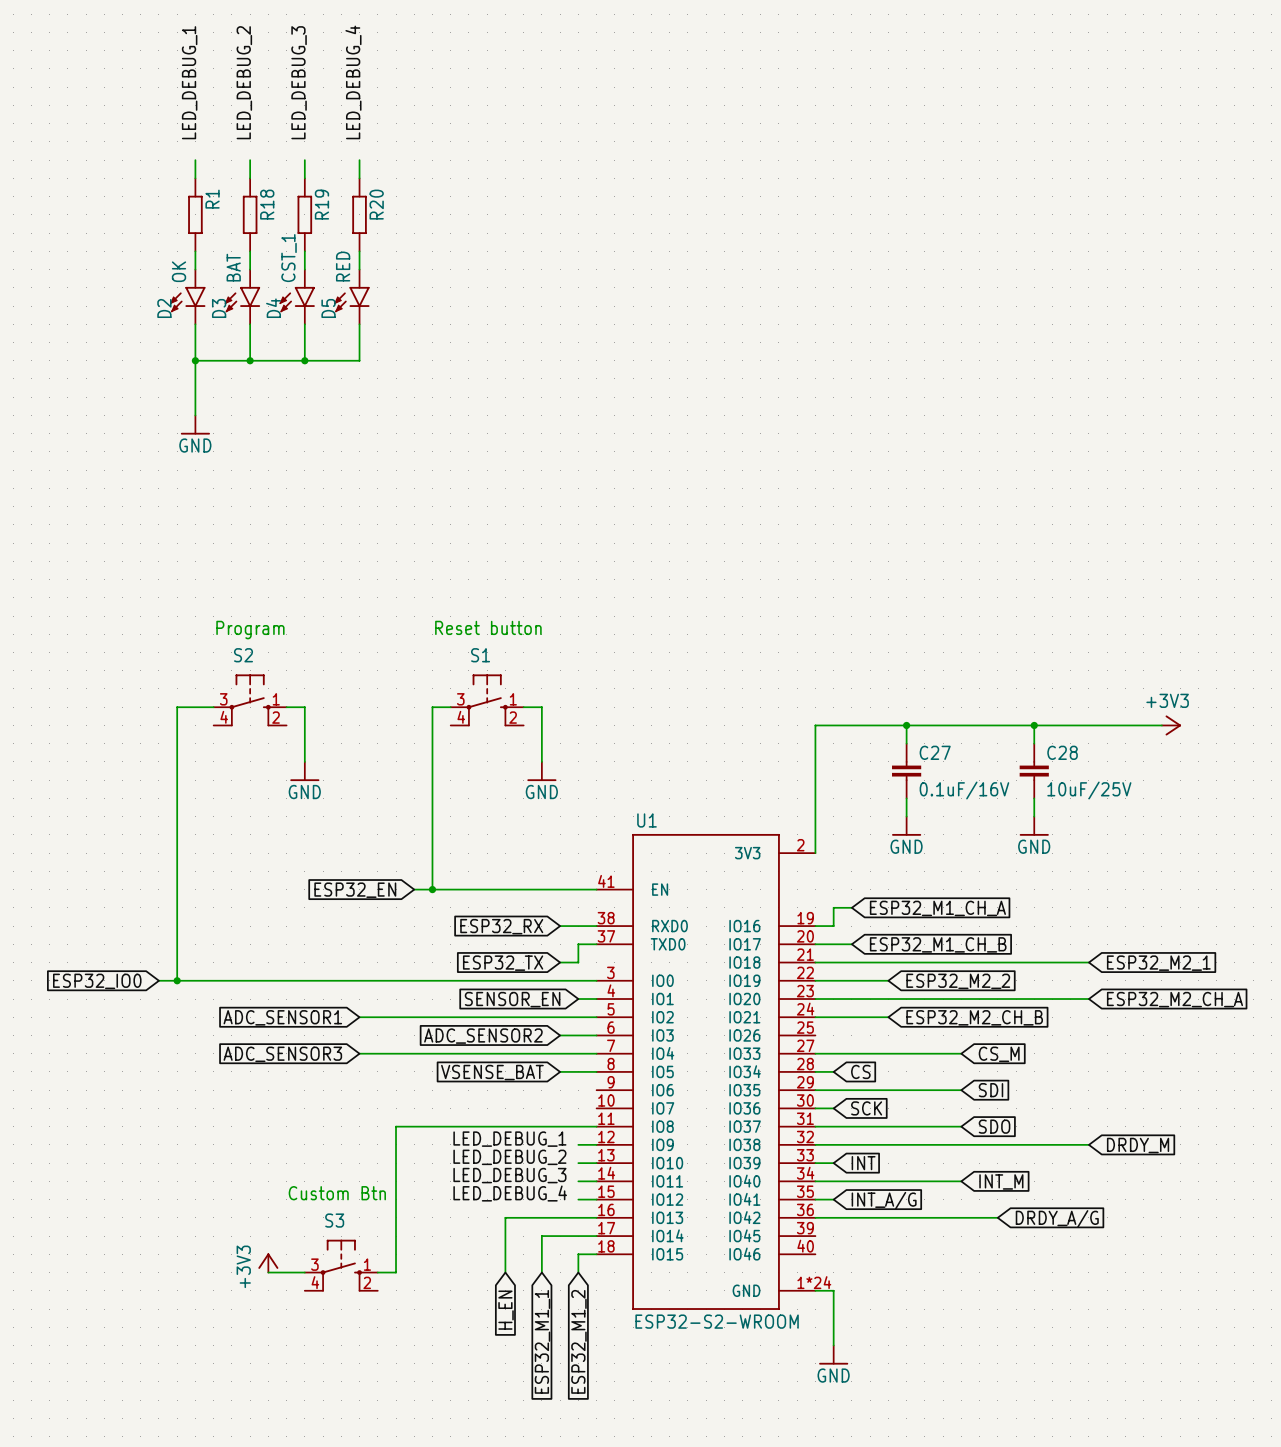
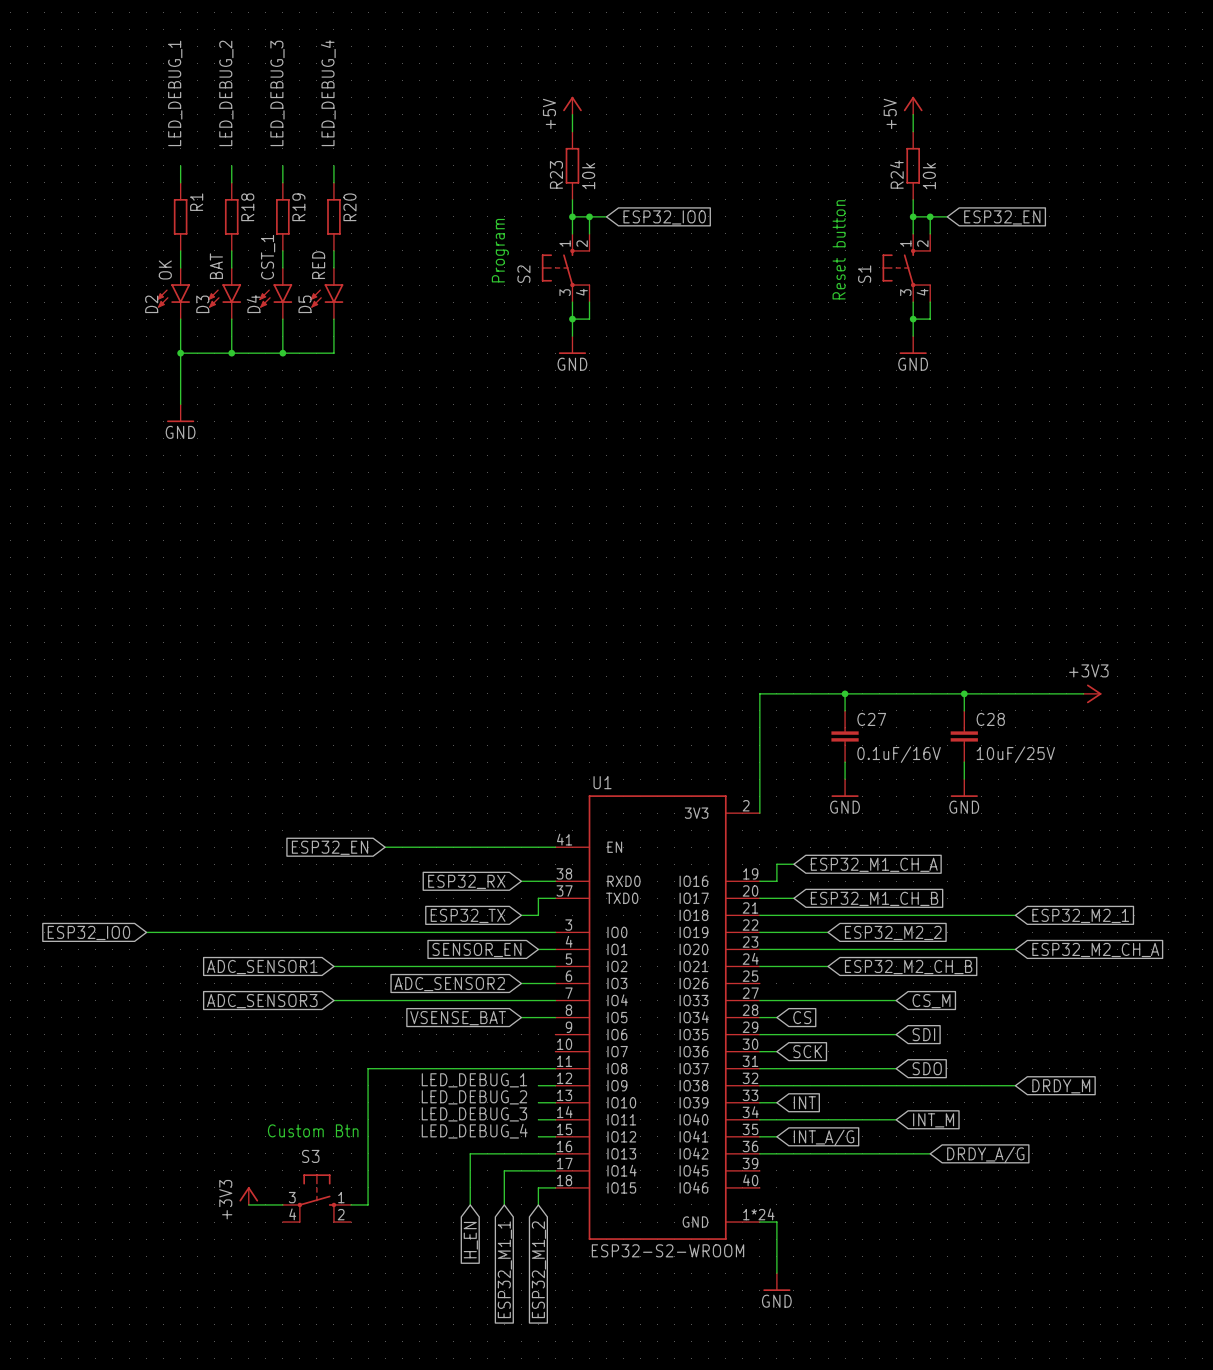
power symbol: none -> +5V (572, 105)
power symbol: none -> +5V (913, 105)
wire: none -> (572, 114) (572, 131)
wire: none -> (913, 114) (913, 131)
R23: none -> 10k (572, 165)
R24: none -> 10k (913, 165)
wire: none -> (572, 199) (572, 233)
wire: none -> (913, 199) (913, 233)
wire: none -> (572, 216) (606, 216)
junction: none -> (572, 216)
wire: none -> (589, 216) (589, 233)
junction: none -> (589, 216)
wire: none -> (913, 216) (947, 216)
junction: none -> (913, 216)
wire: none -> (930, 216) (930, 233)
junction: none -> (930, 216)
global label: none -> ESP32_IO0 (664, 217)
global label: none -> ESP32_EN (1002, 217)
text: none -> Reset button (839, 249)
text: none -> Program (500, 250)
wire: none -> (572, 302) (572, 336)
wire: none -> (589, 302) (589, 319) (572, 319)
wire: none -> (913, 302) (913, 336)
wire: none -> (930, 302) (930, 319) (913, 319)
junction: none -> (572, 319)
junction: none -> (913, 319)
power symbol: none -> GND (572, 345)
power symbol: none -> GND (913, 345)
text: Reset button (488, 627) -> none
text: Program (250, 630) -> none
S2 rotation: 0° (250, 700) -> 90° counterclockwise (565, 267)
S2 position: (250, 700) -> (565, 267)
S1 rotation: 0° (487, 700) -> 90° counterclockwise (906, 267)
S1 position: (487, 700) -> (906, 267)
wire: (213, 707) (177, 707) (177, 980) -> none
wire: (286, 707) (304, 707) (304, 761) -> none
wire: (450, 707) (432, 707) (432, 889) -> none
wire: (523, 707) (541, 707) (541, 761) -> none
power symbol: GND (304, 771) -> none
power symbol: GND (541, 771) -> none
junction: (432, 889) -> none
junction: (177, 980) -> none

